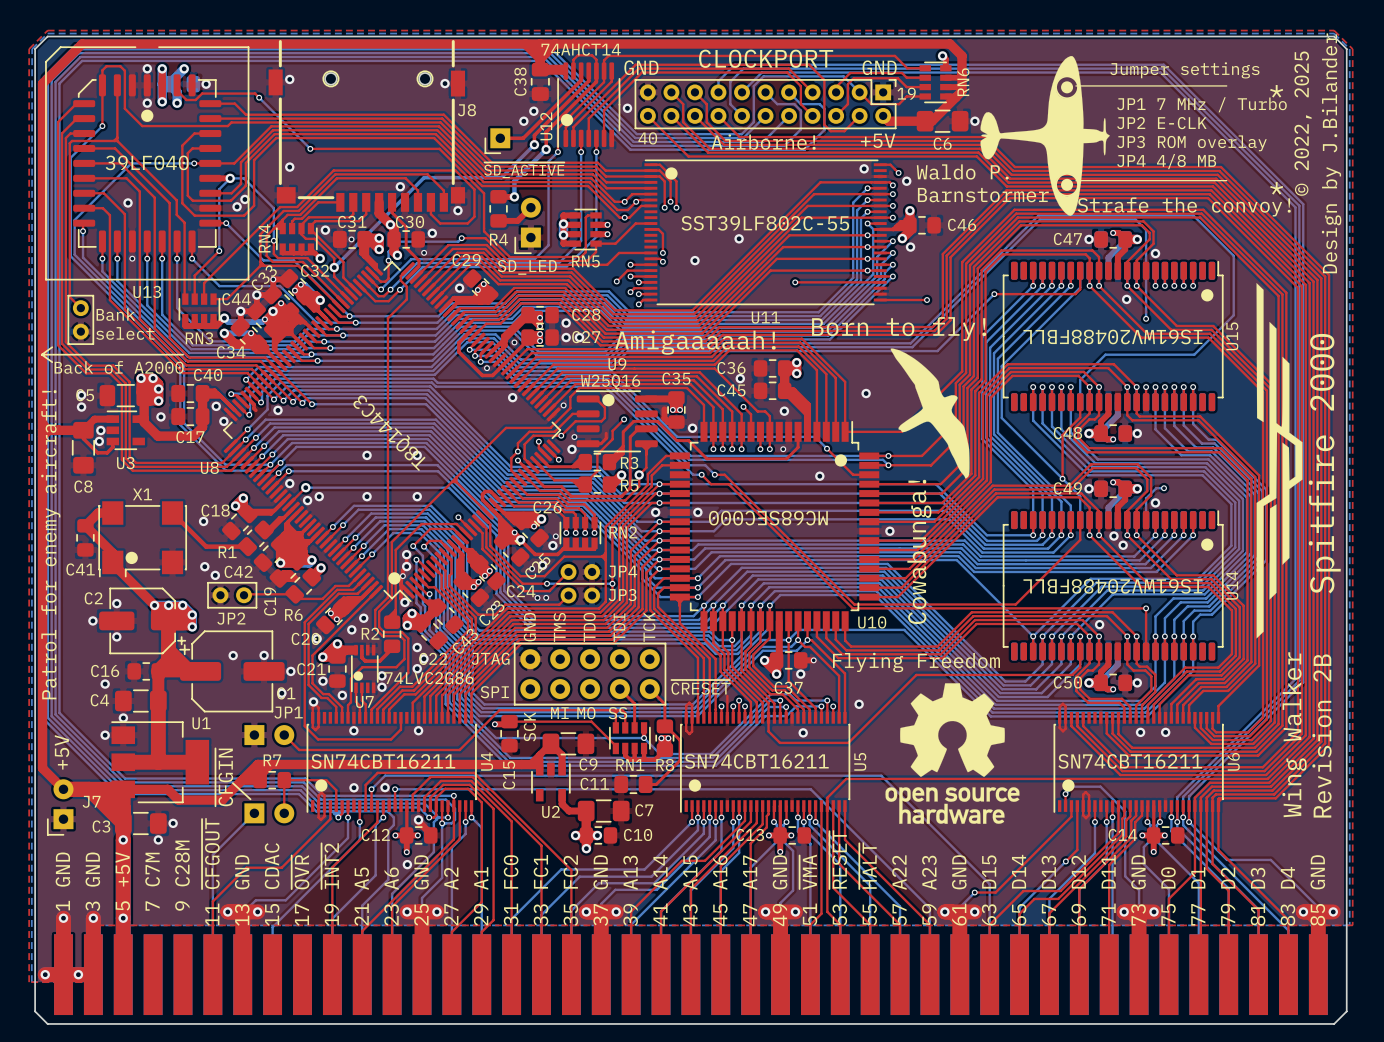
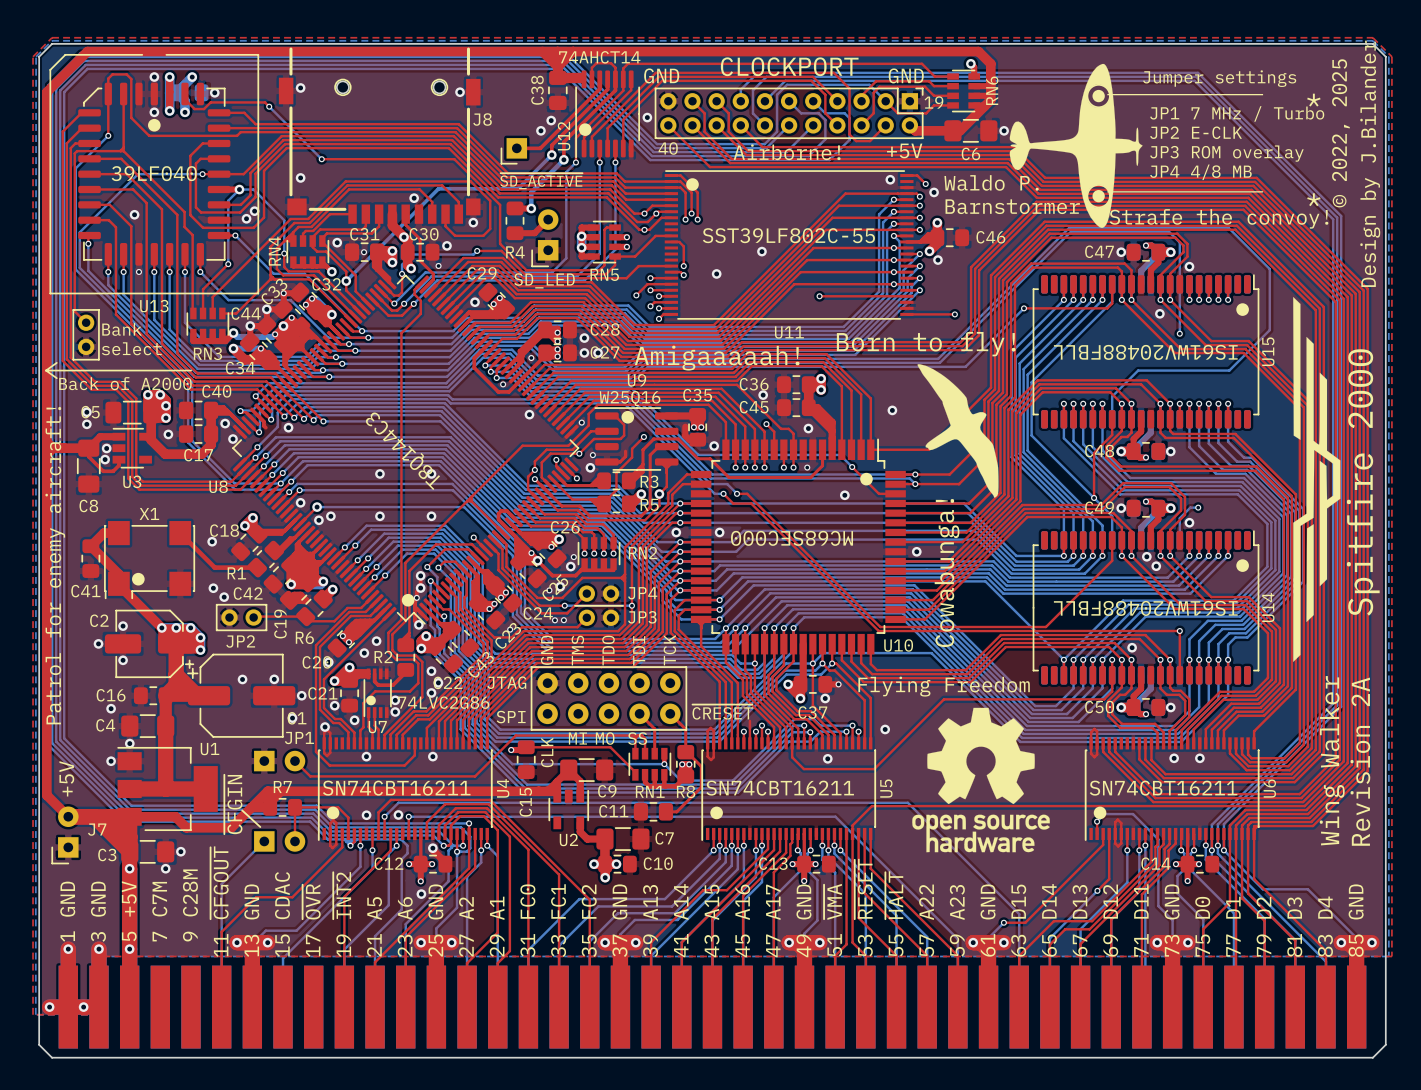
text: SCK (529, 726) -> CLK (547, 752)
text: Revision 2B (1321, 735) -> Revision 2A (1360, 761)

